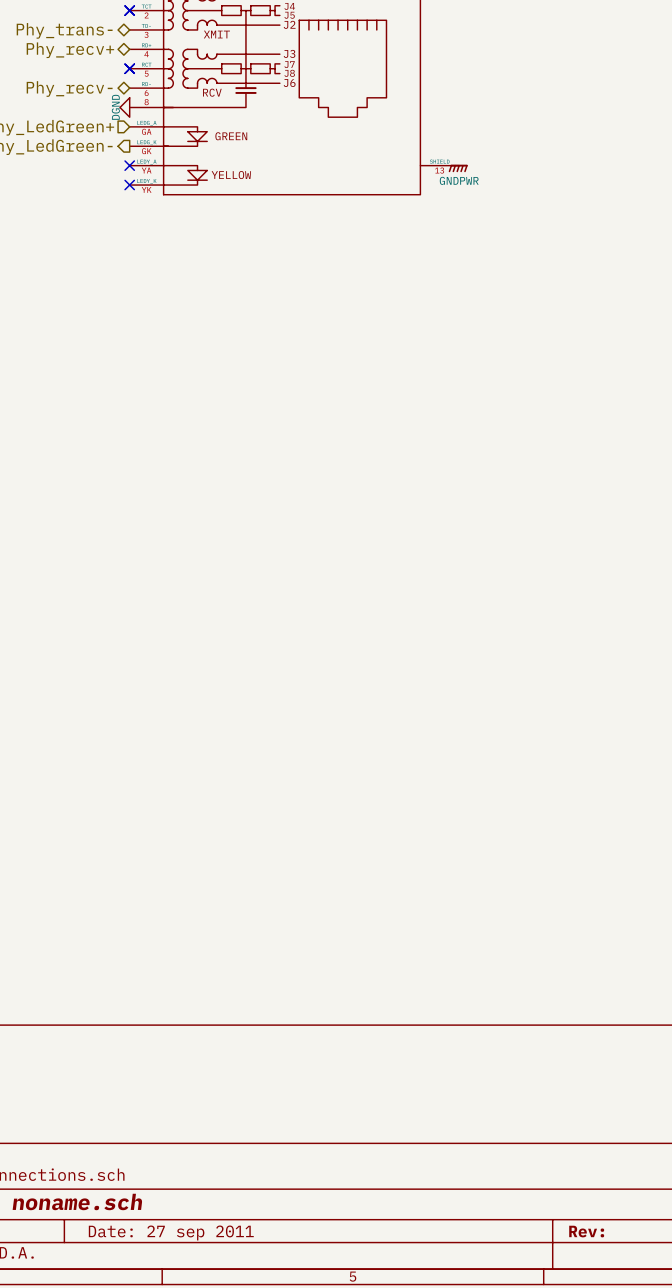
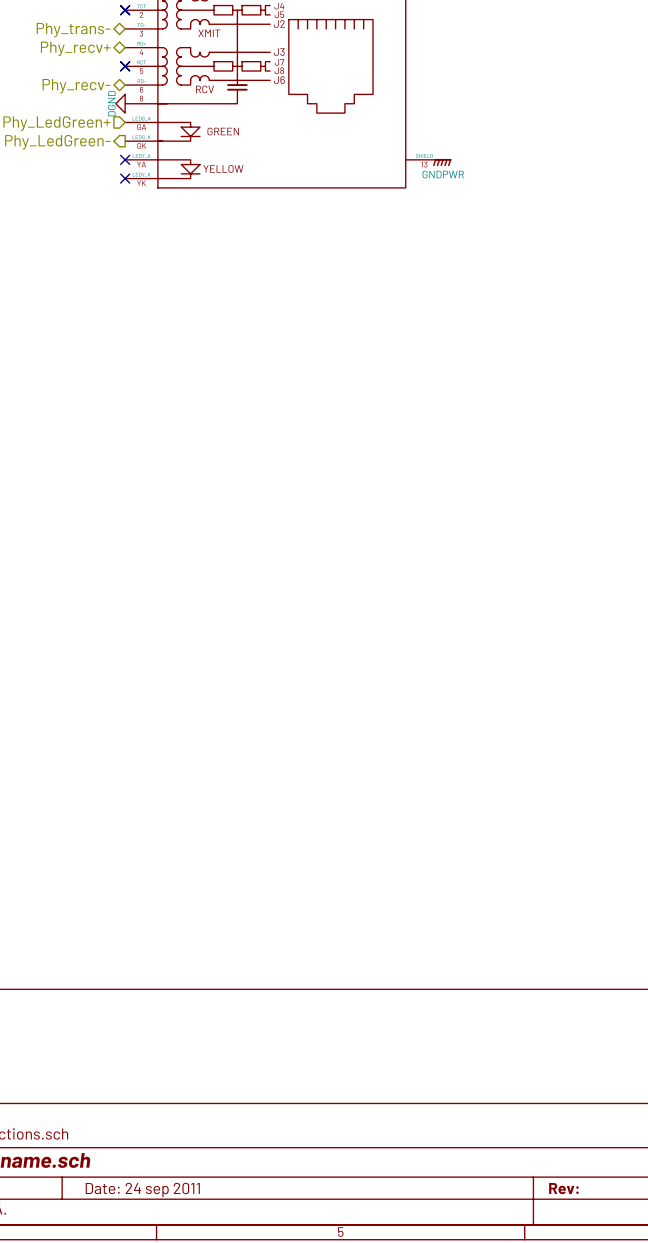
title block: Date: 27 sep 2011 (171, 1232) -> Date: 24 sep 2011 (142, 1189)

